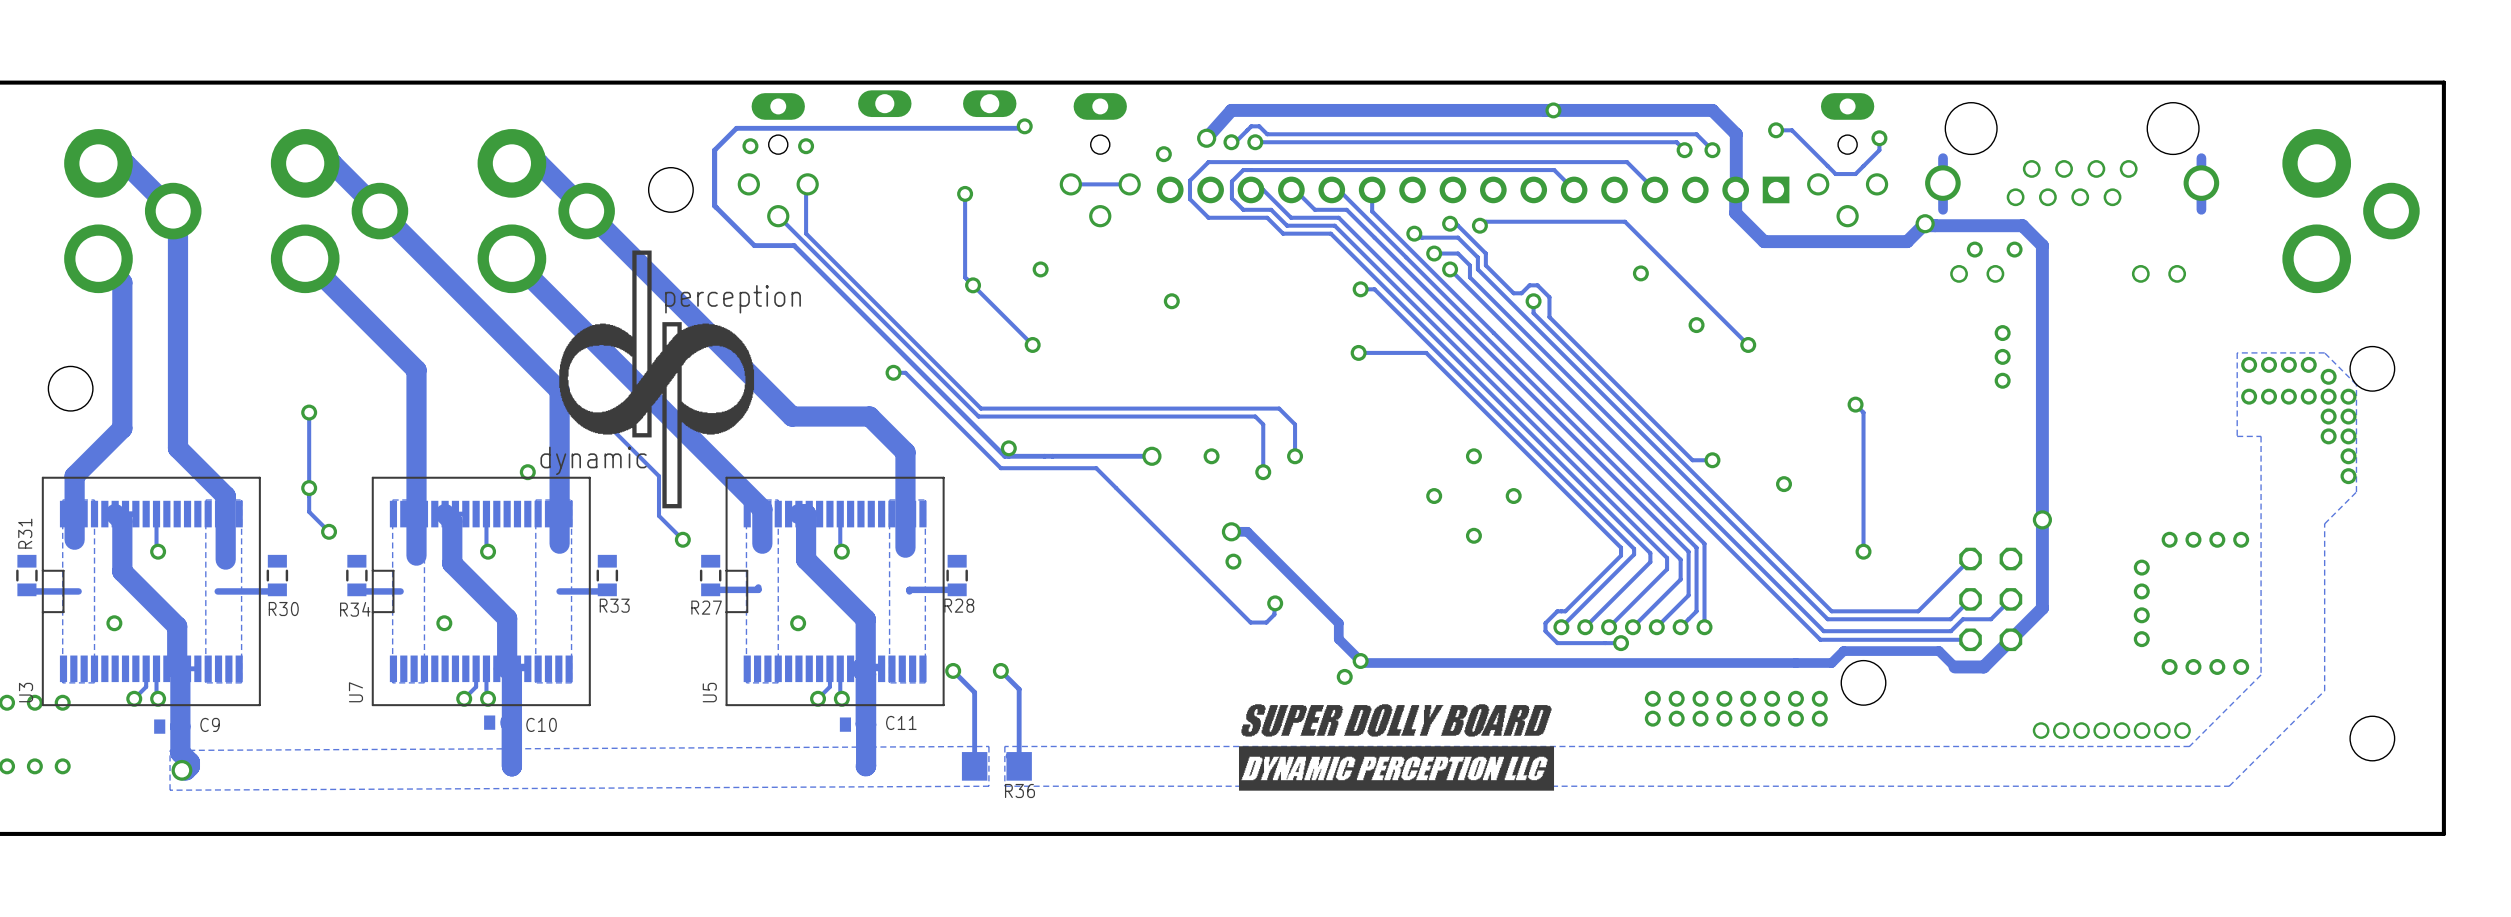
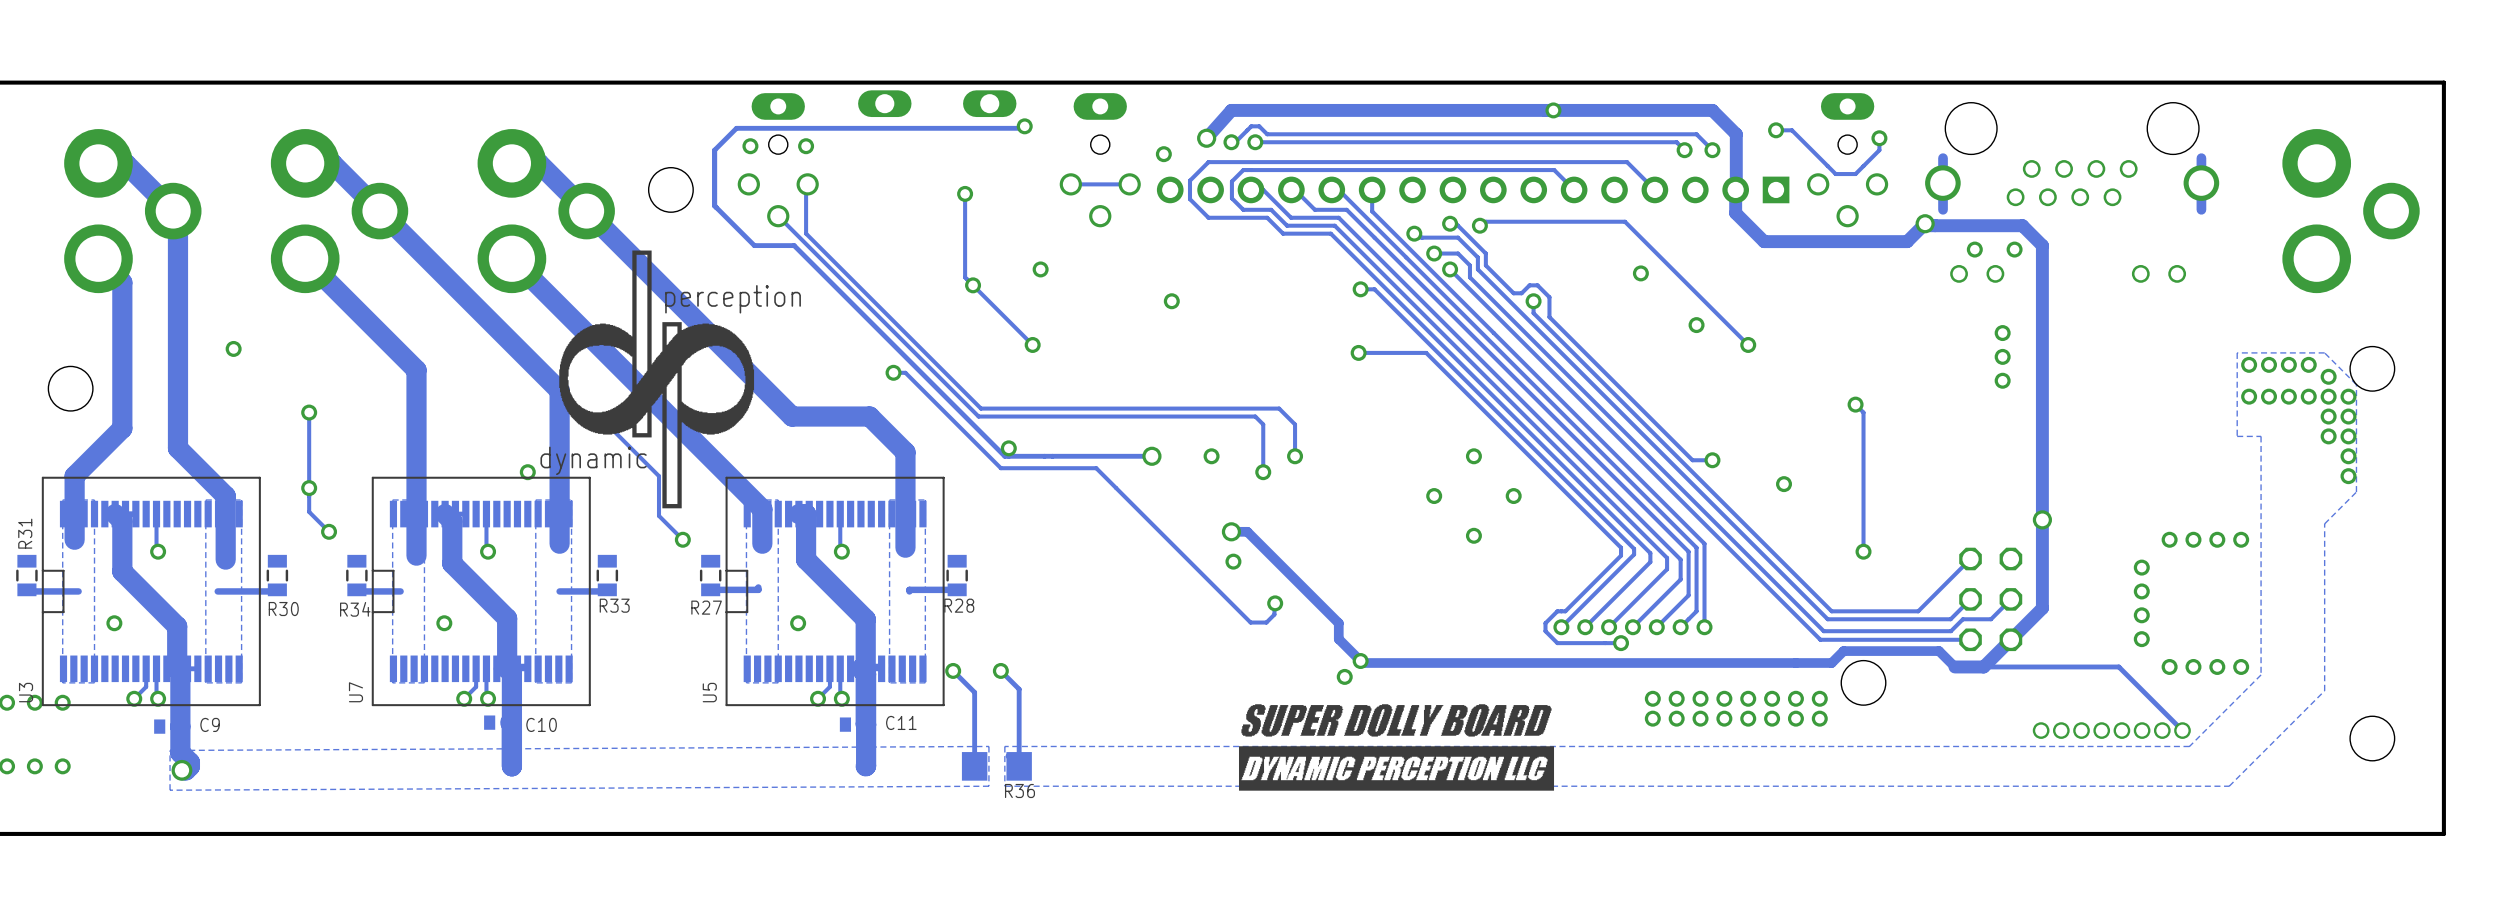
via: none -> (233, 348)
track: none -> (1983, 666) (2118, 666) (2182, 730)

